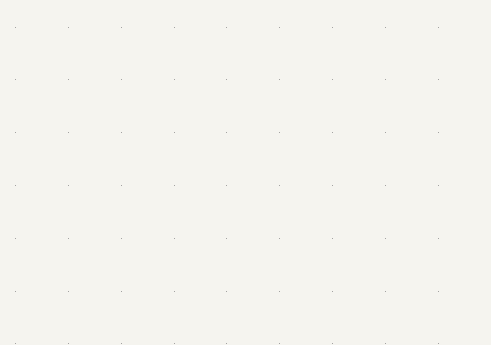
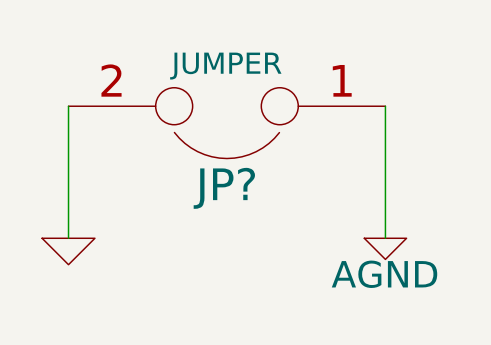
wire: none -> (68, 106) (68, 238)
wire: none -> (385, 106) (385, 238)
JP?: none -> JUMPER (226, 123)
power symbol: none -> AGND (385, 248)
power symbol: none -> (68, 251)

